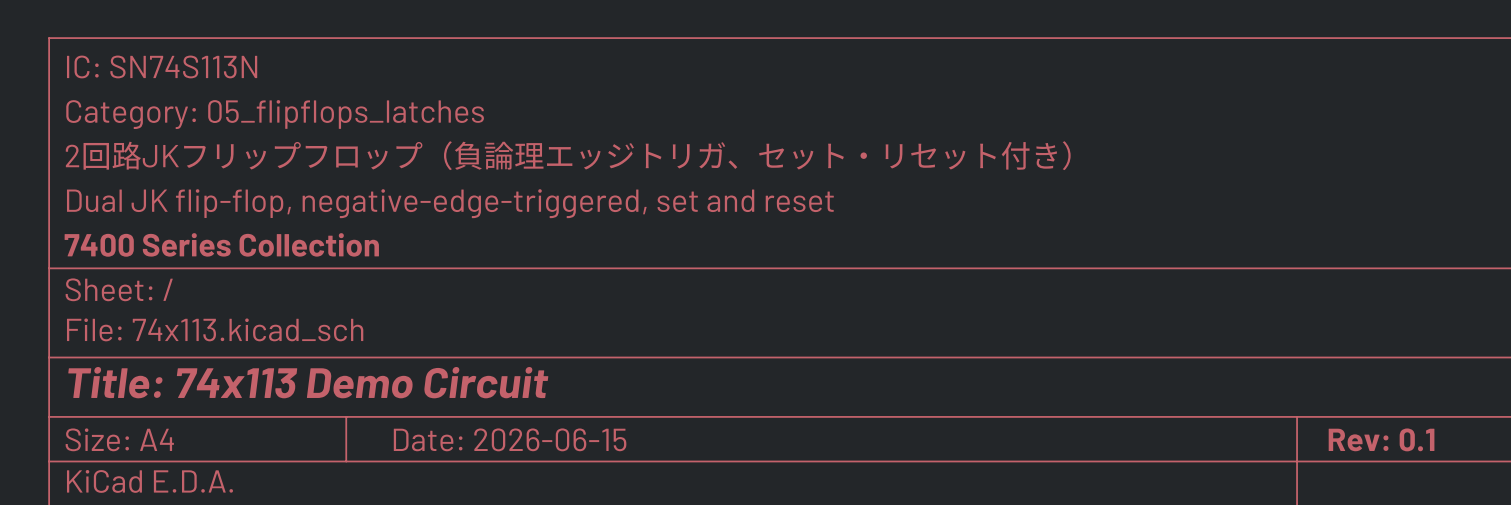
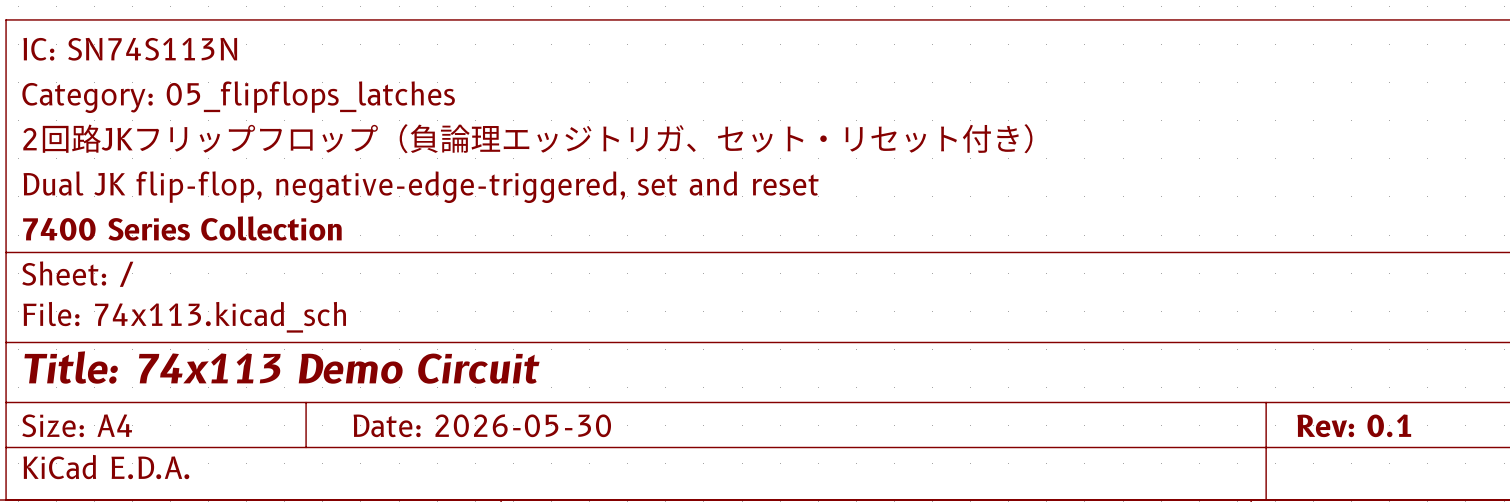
title block: Date: 2026-06-15 (510, 439) -> Date: 2026-05-30 (482, 425)

